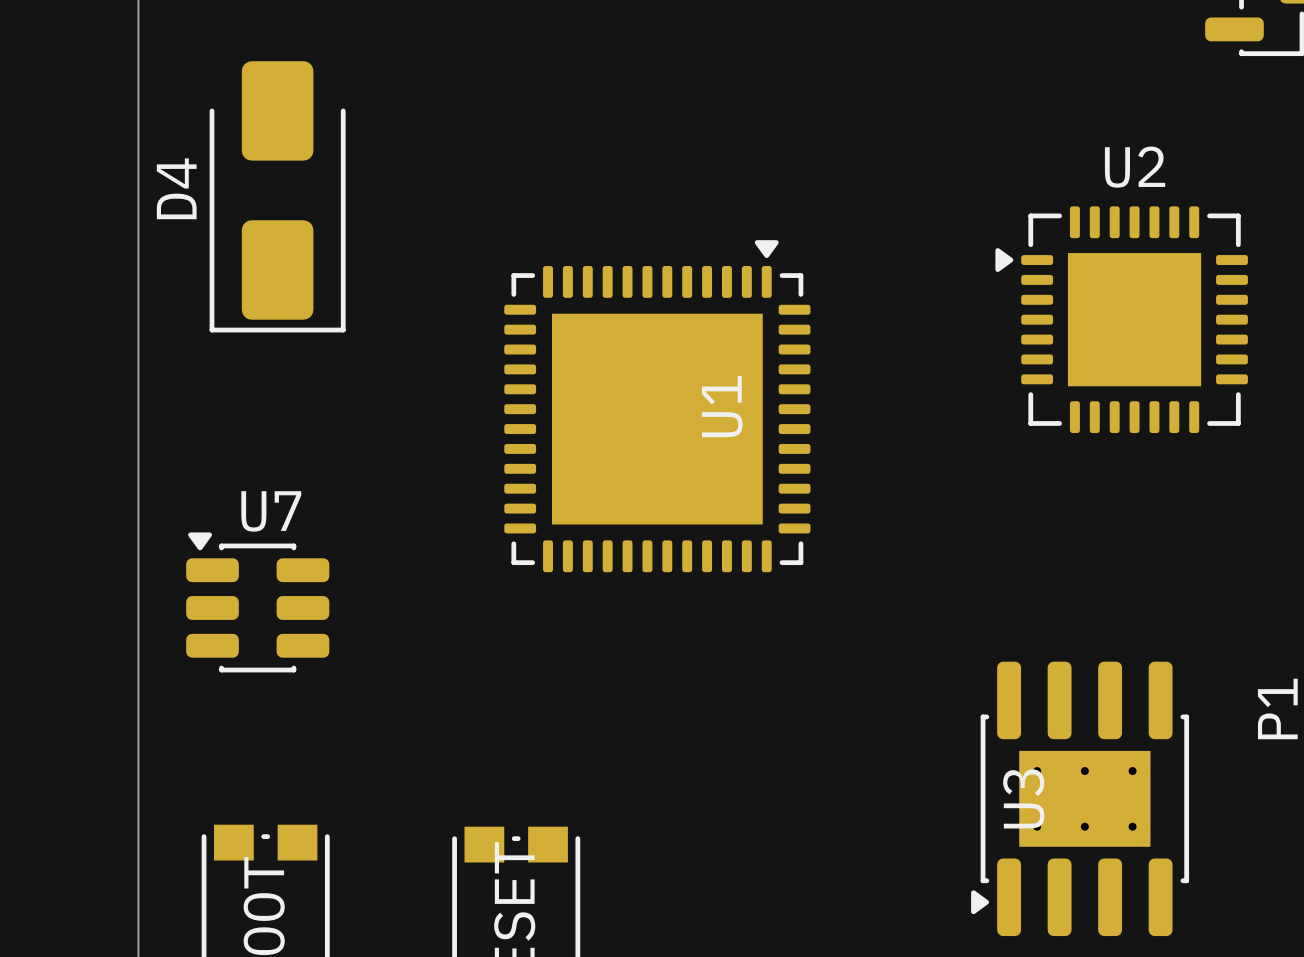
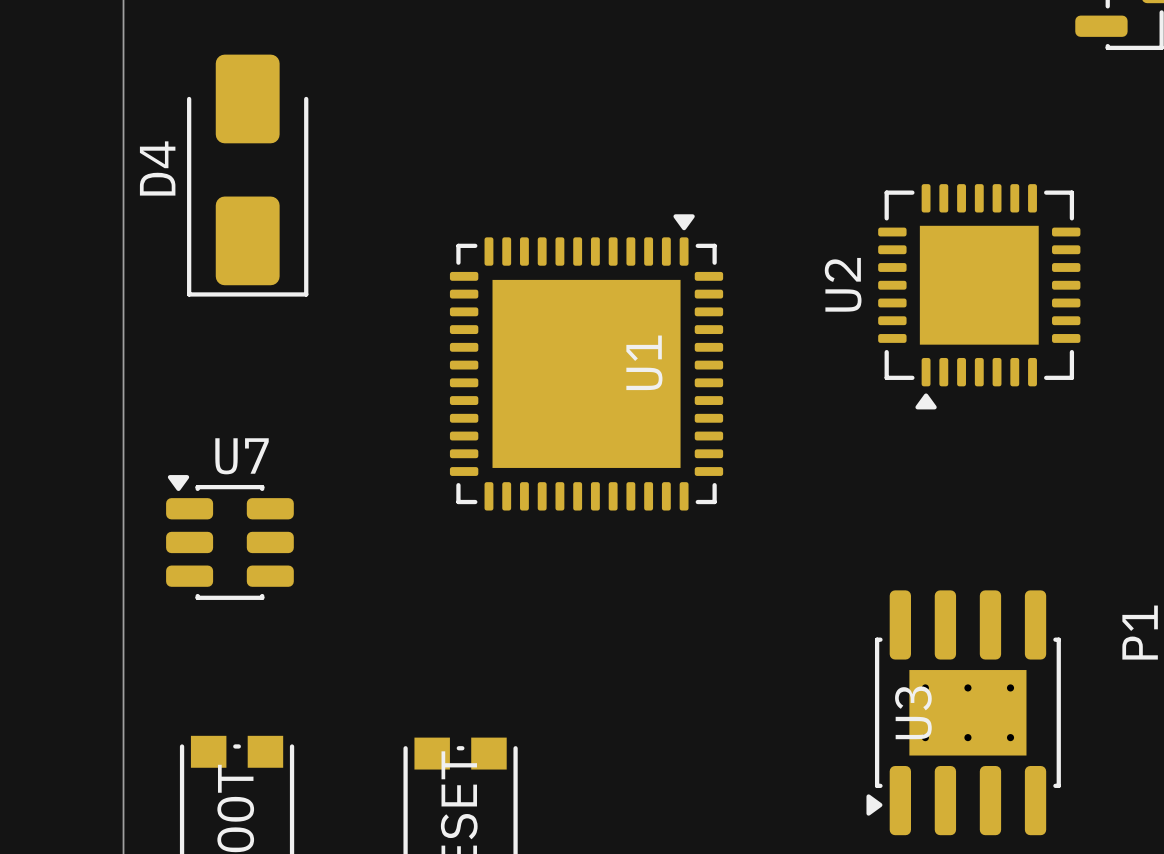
U2 rotation: 0° (1121, 319) -> 90° counterclockwise (979, 296)

